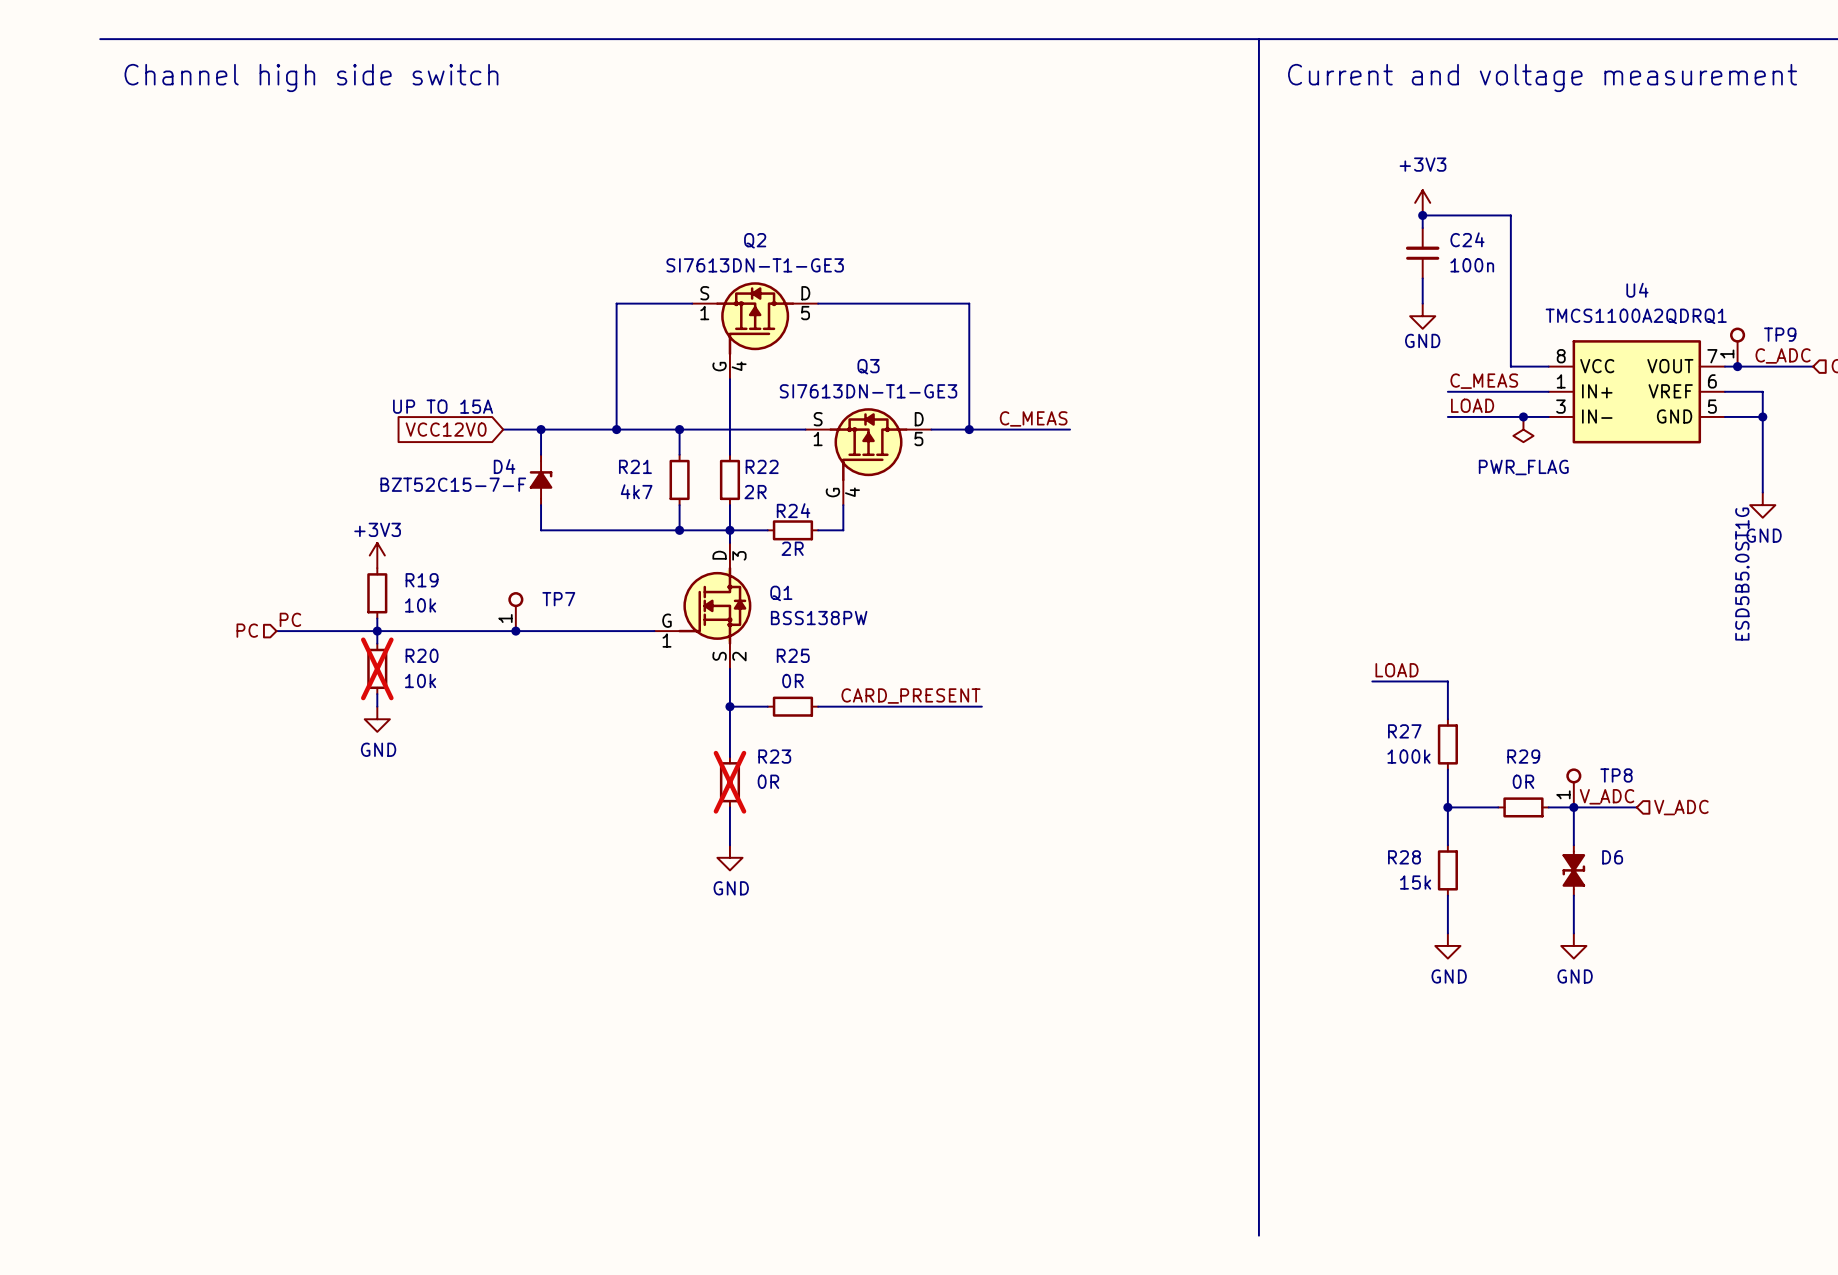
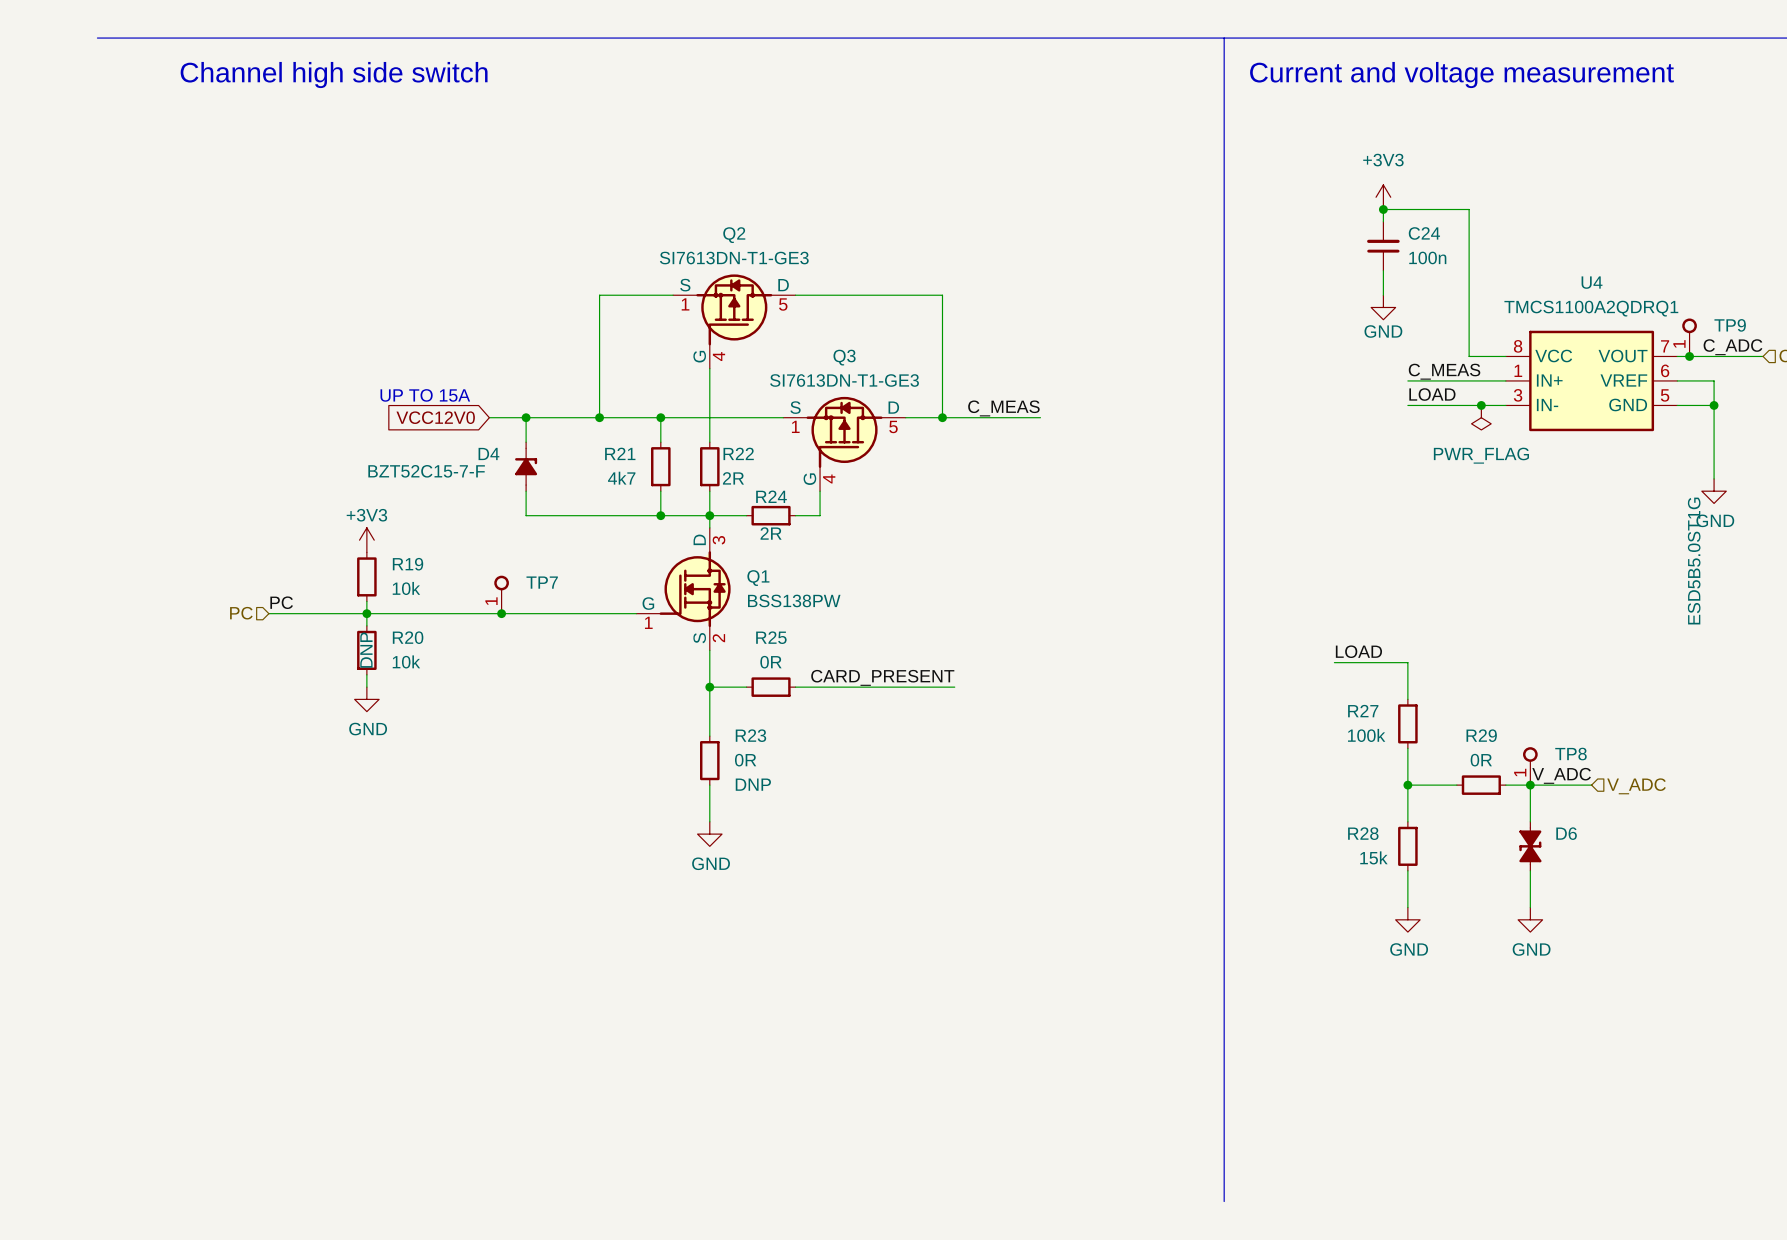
R20 text: none -> DNP (366, 650)
R20 do-not-place cross: (377, 668) -> none
R23 do-not-place cross: (729, 782) -> none
R23 text: none -> DNP (753, 784)

